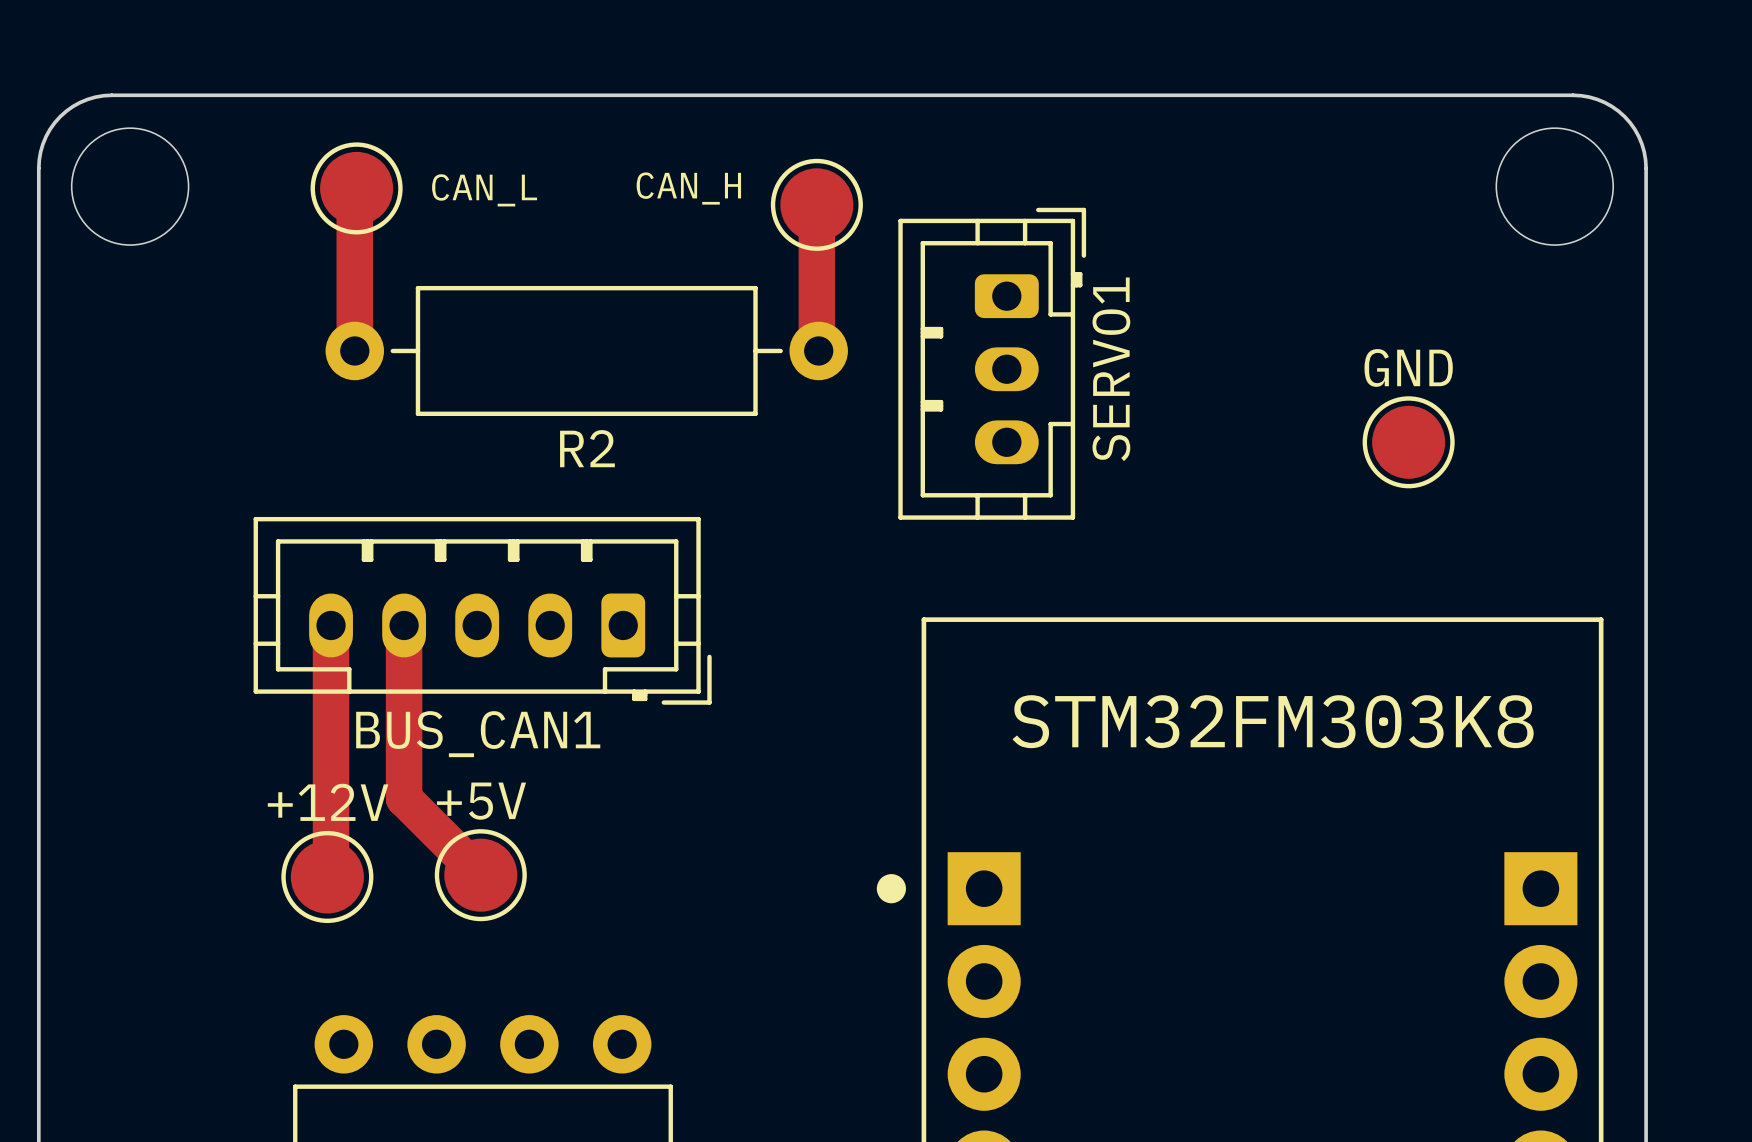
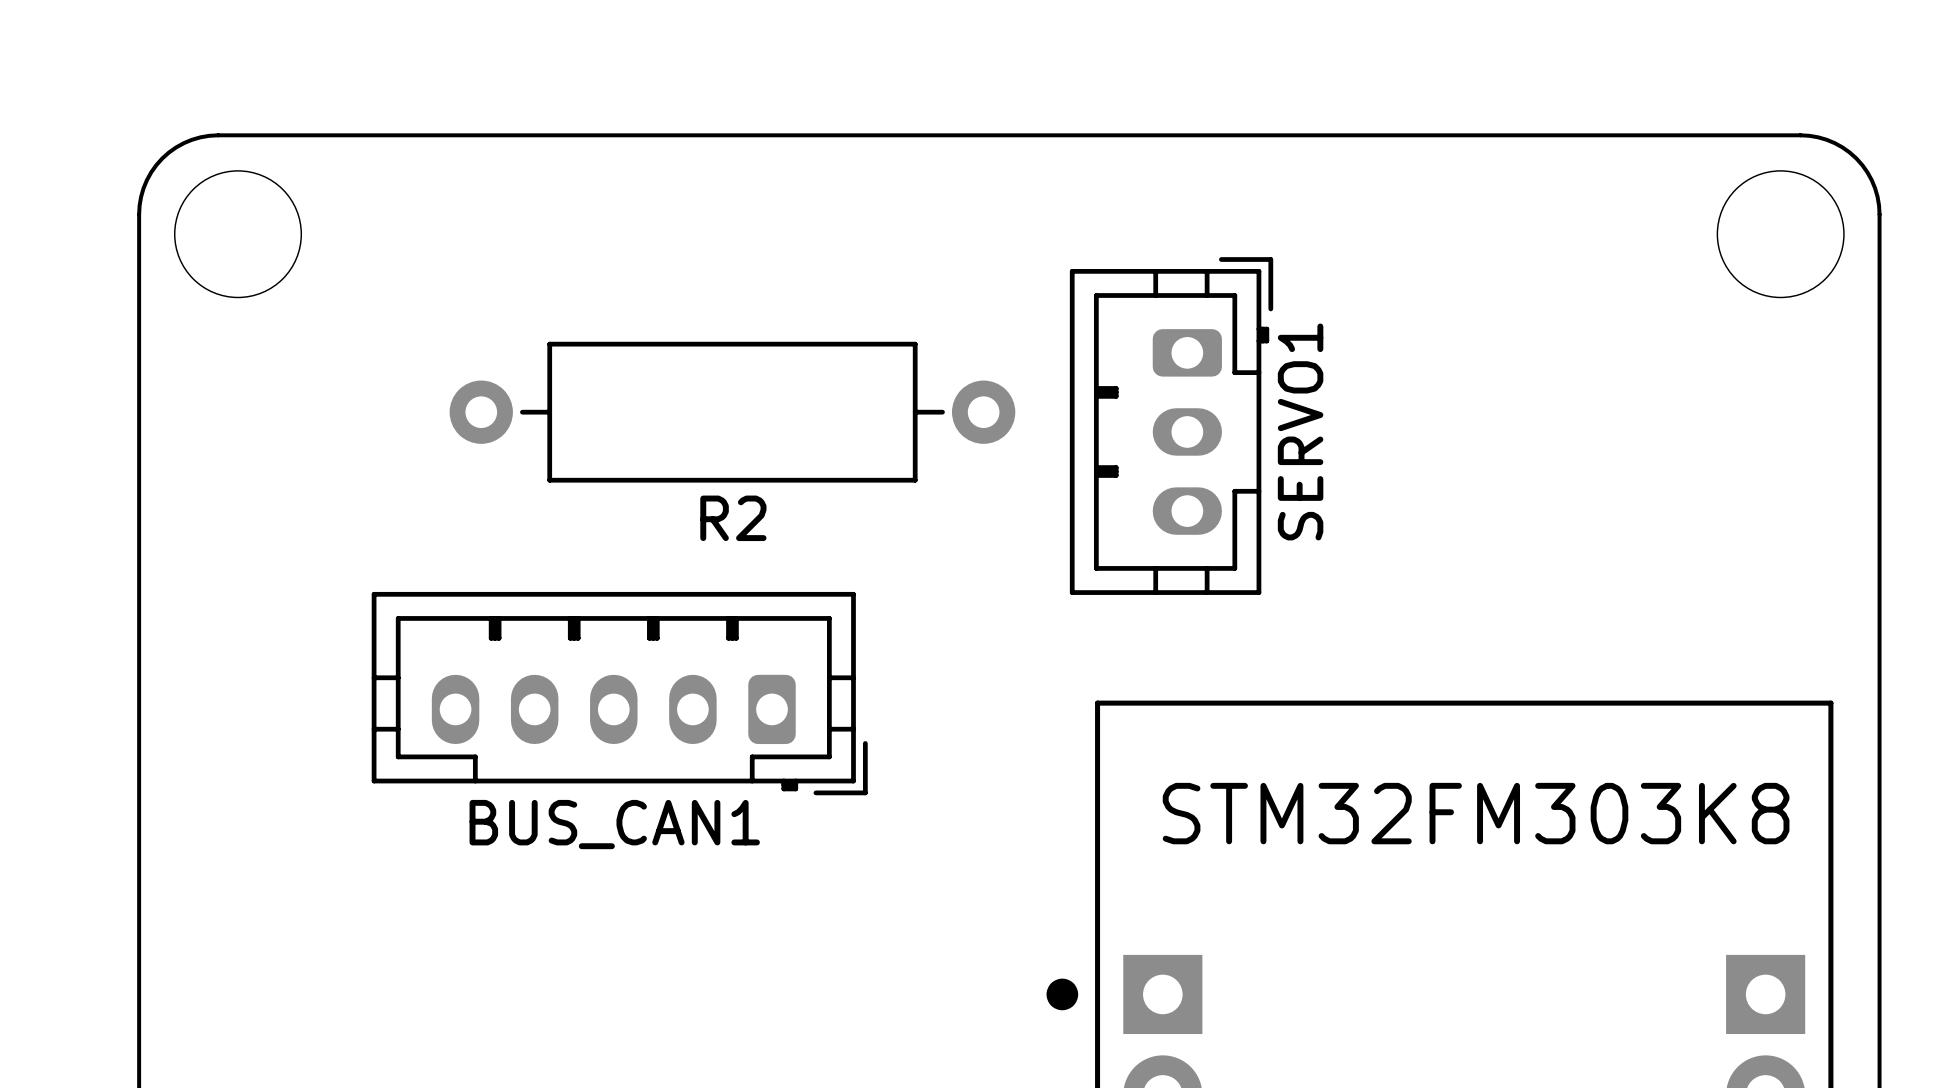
track: (356, 188) (354, 190) (354, 350) -> none
CAN_L: (356, 188) -> none
track: (816, 204) (816, 349) (818, 350) -> none
CAN_H: (816, 204) -> none
GND: (1408, 442) -> none
track: (331, 625) (331, 873) (327, 876) -> none
track: (404, 625) (404, 798) (480, 875) -> none
+5V: (480, 875) -> none
+12V: (327, 876) -> none

